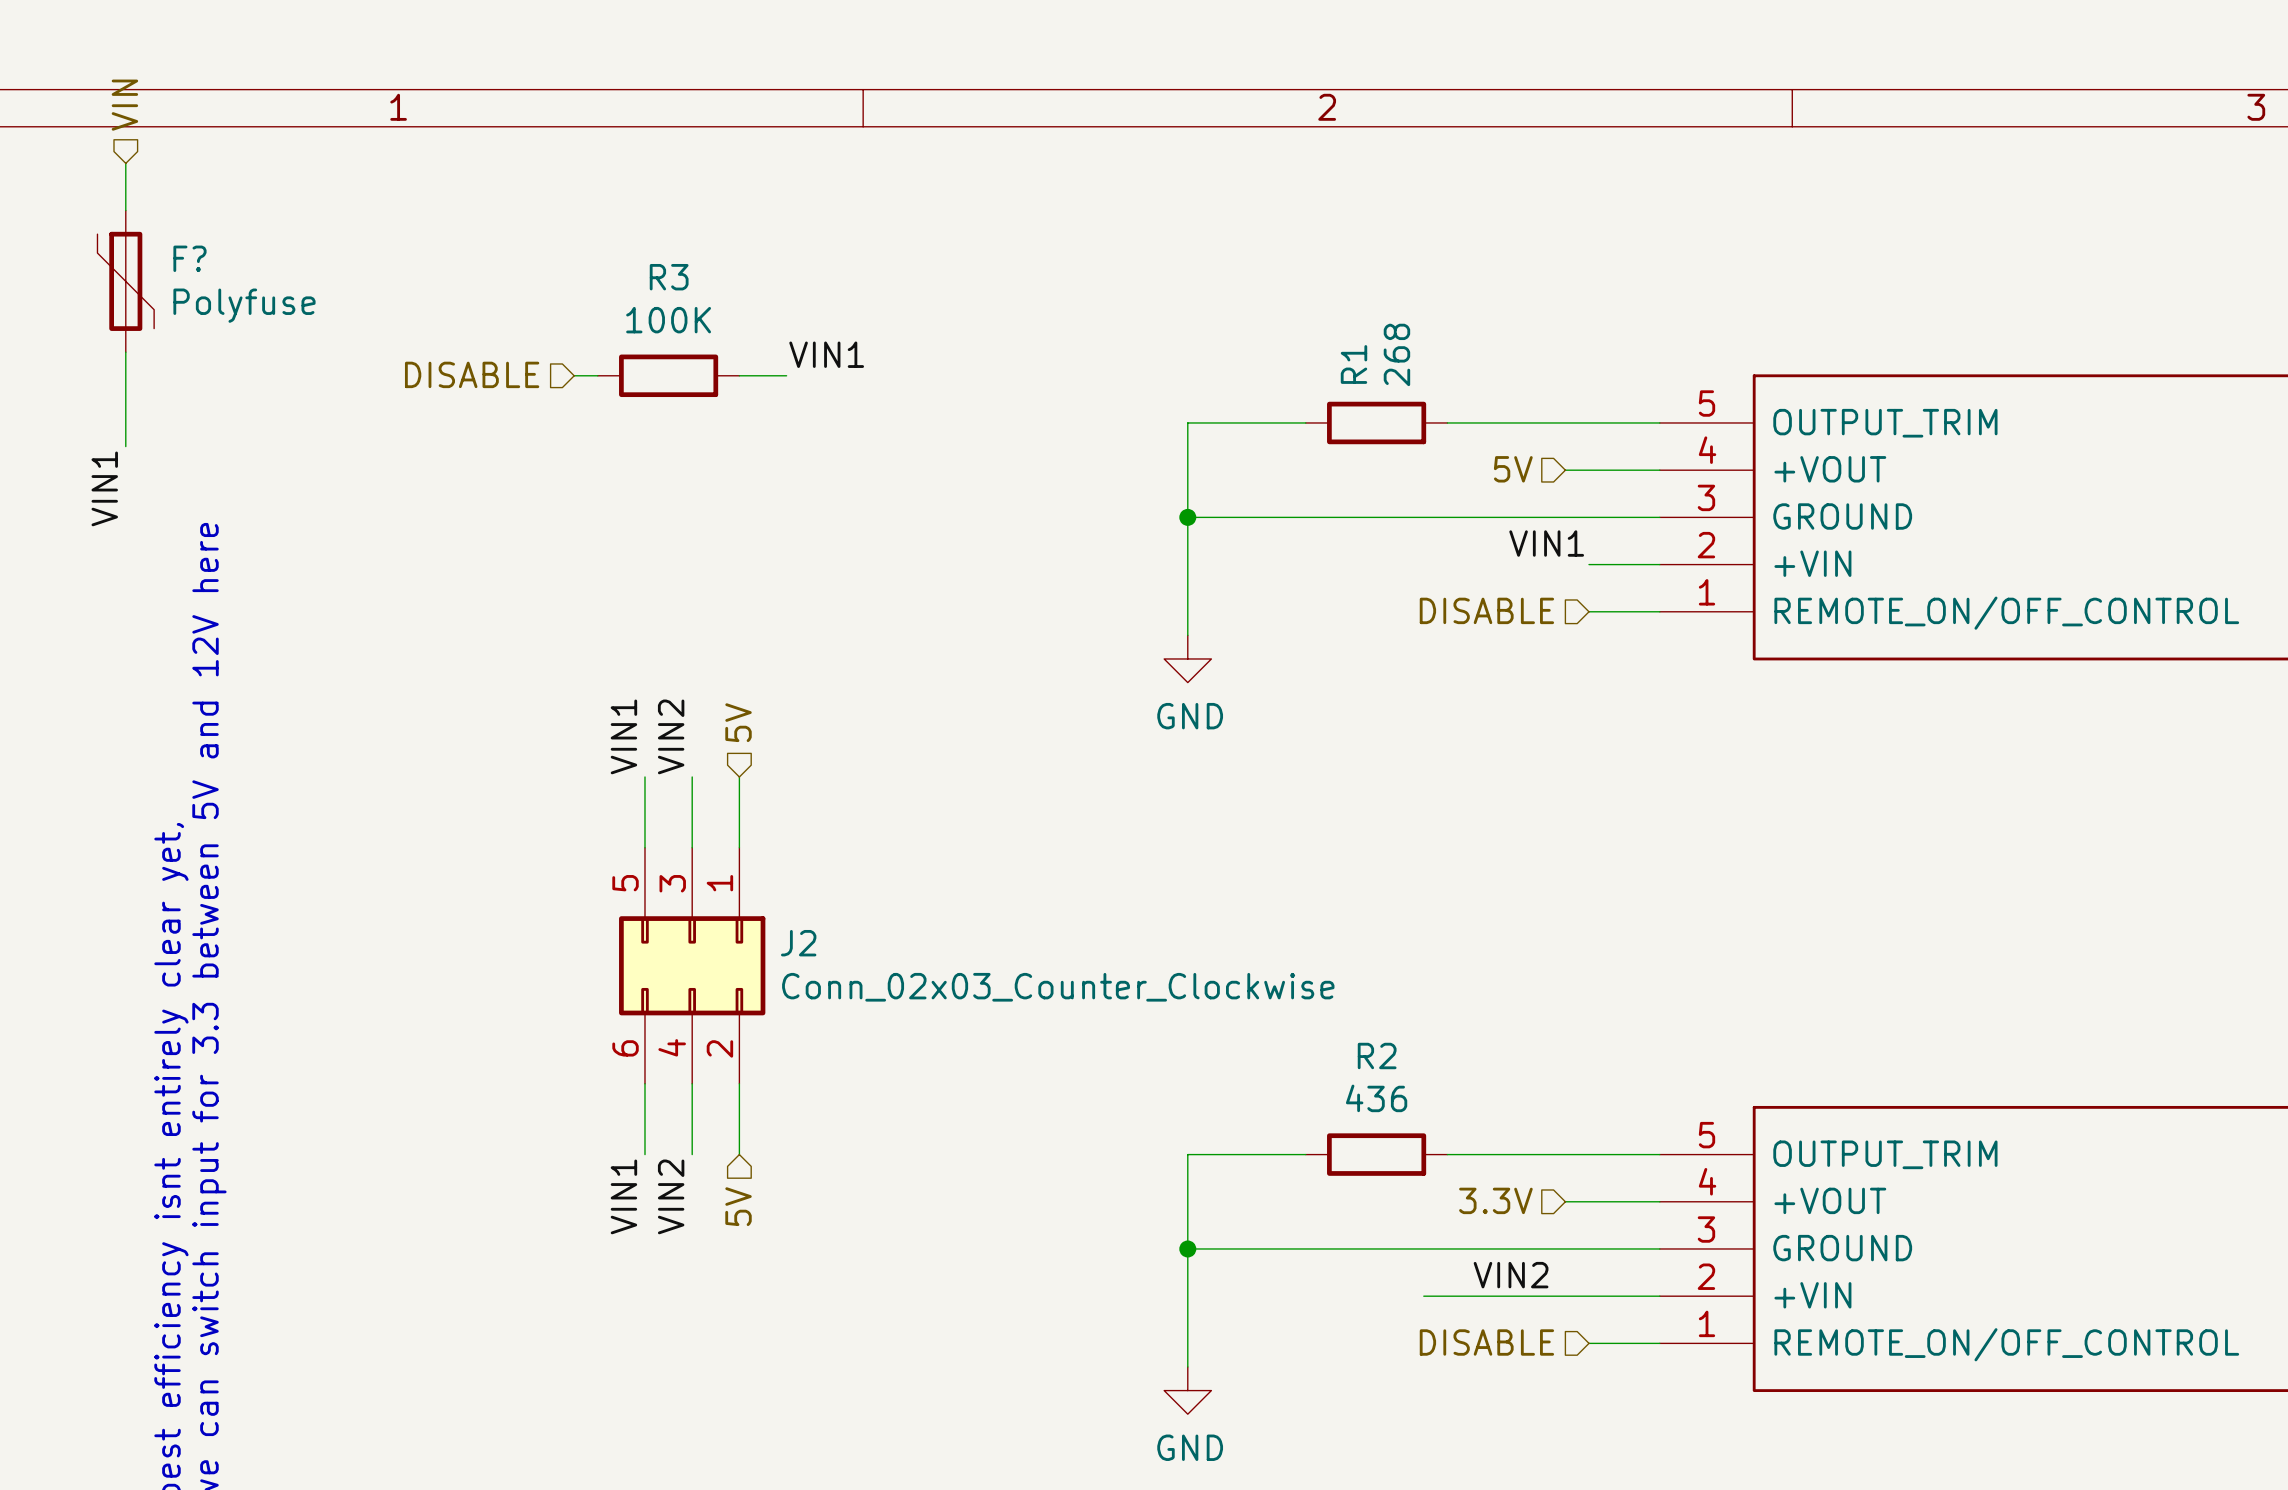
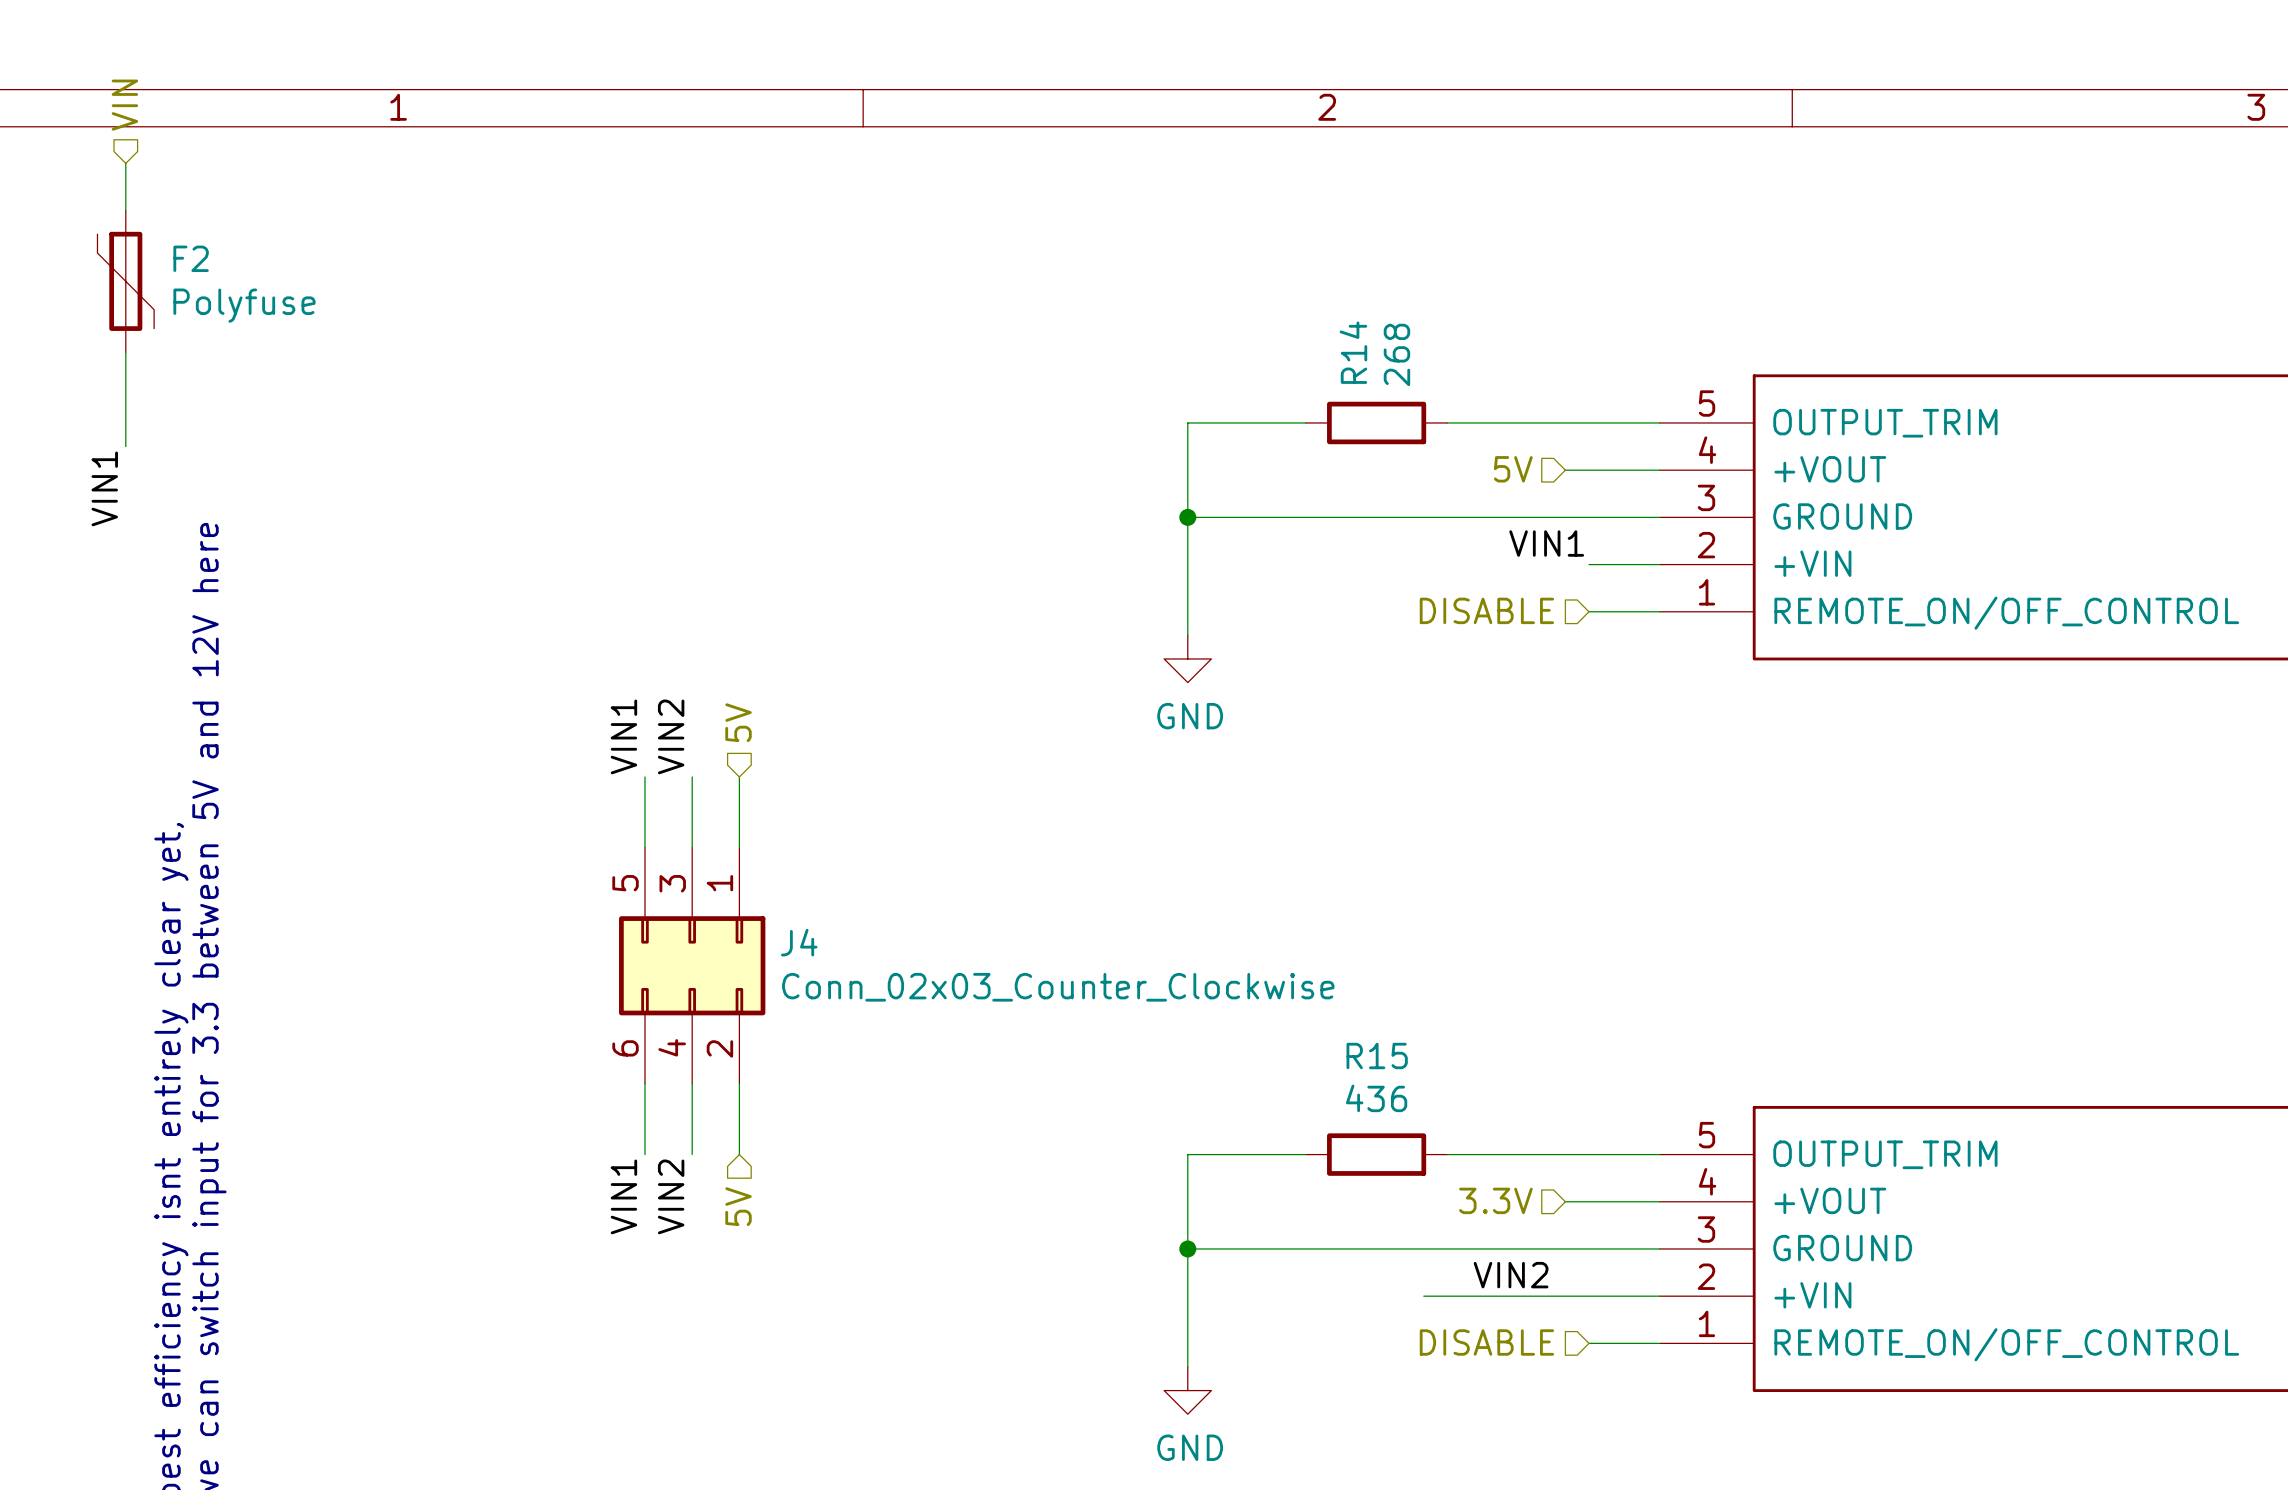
F? name: F? (189, 258) -> F2 (191, 258)
label: VIN1 (826, 354) -> none
R1 name: R1 (1354, 364) -> R14 (1353, 352)
hierarchical label: DISABLE (472, 374) -> none
wire: (574, 375) (597, 375) -> none
R3: 100K (668, 375) -> none
wire: (739, 375) (786, 375) -> none
J2 name: J2 (798, 943) -> J4 (799, 942)
R2 name: R2 (1377, 1056) -> R15 (1377, 1056)

